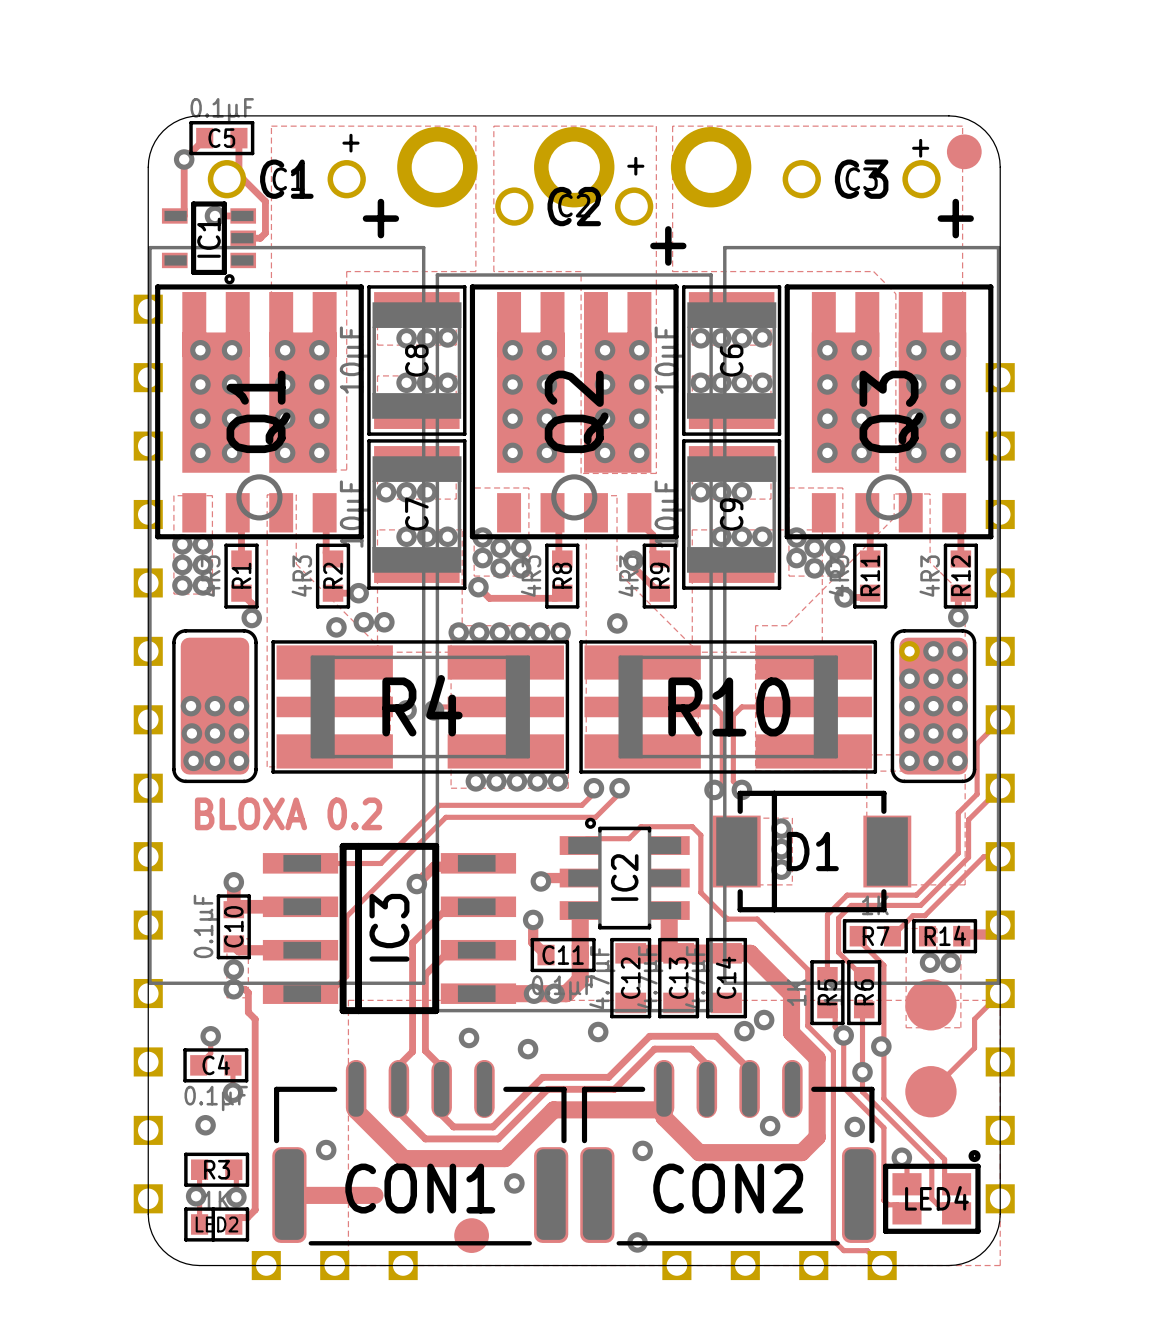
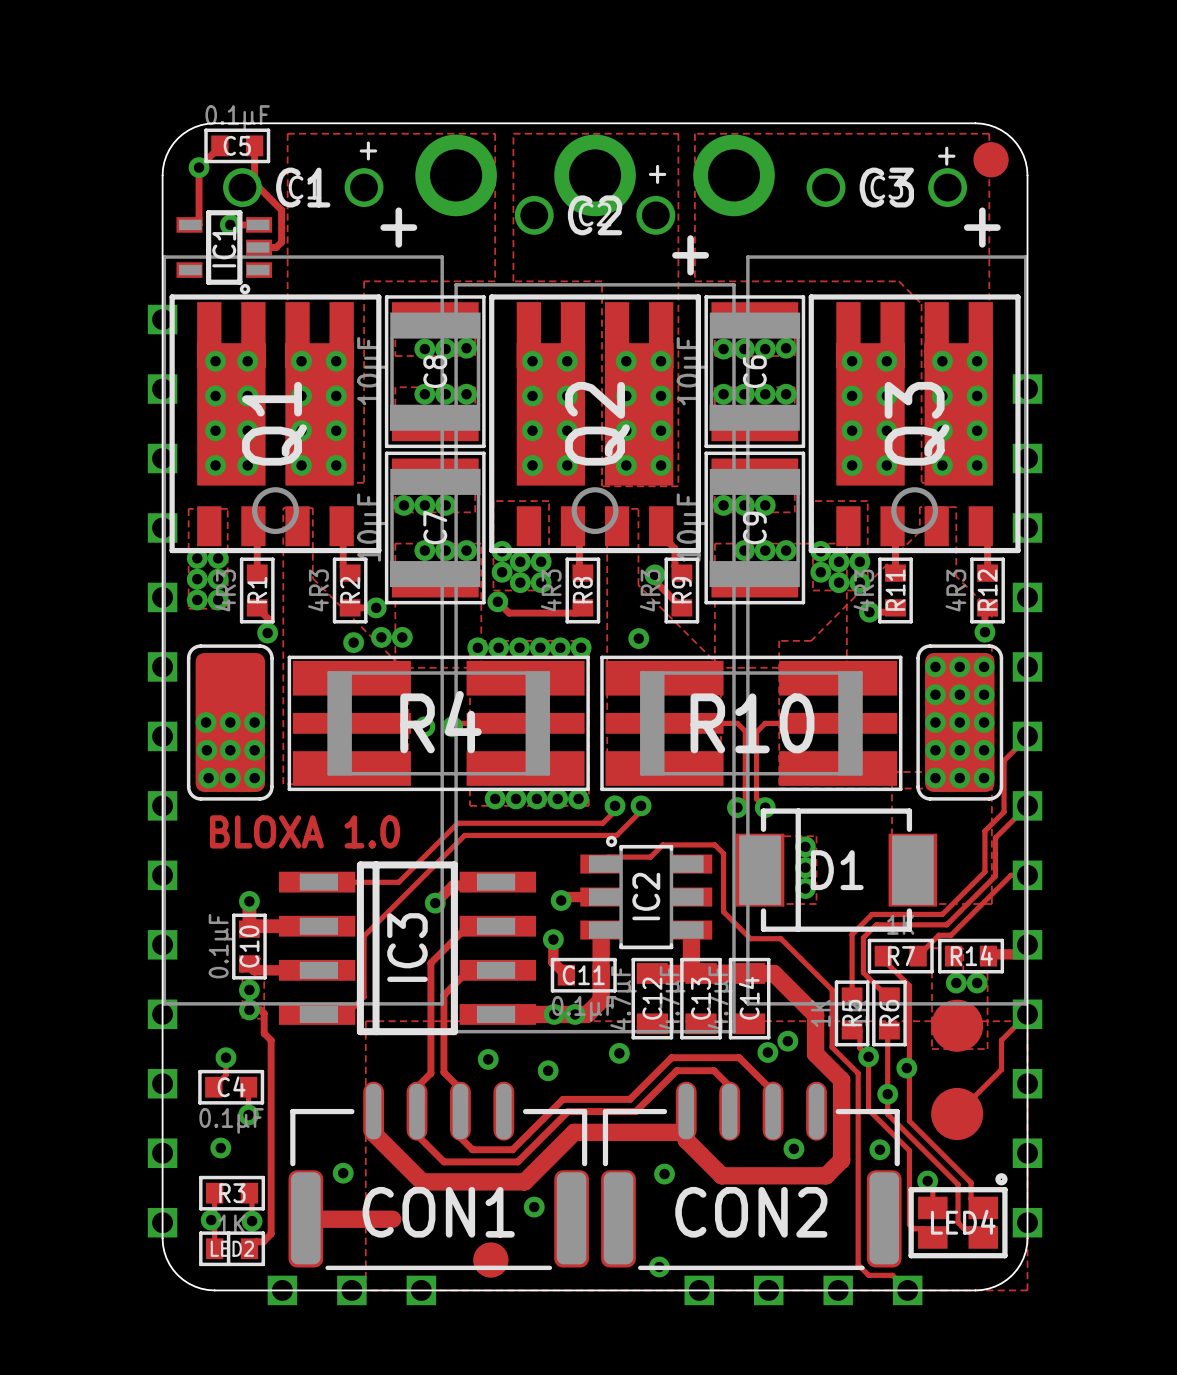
text: BLOXA 0.2 (288, 813) -> BLOXA 1.0 (305, 831)

